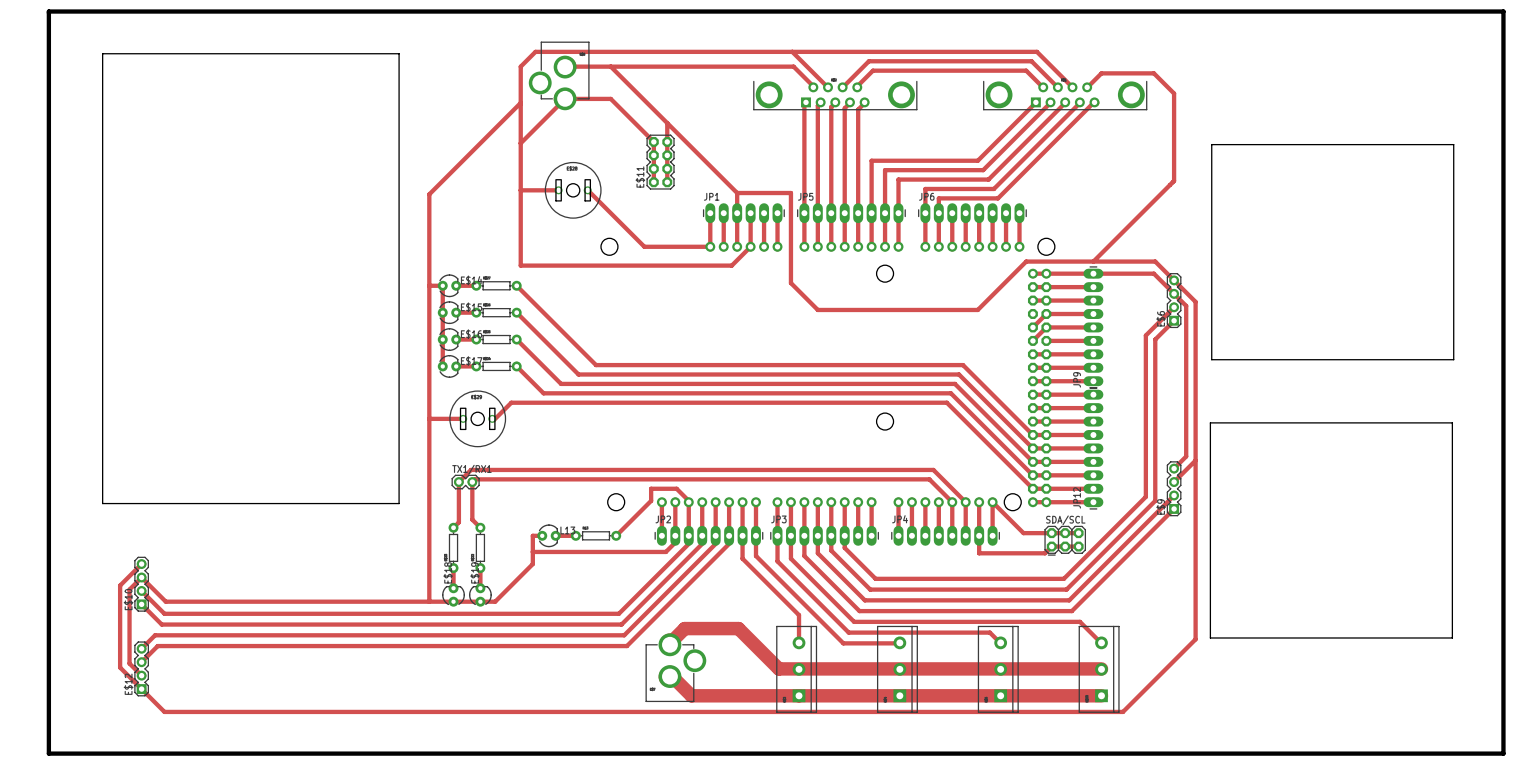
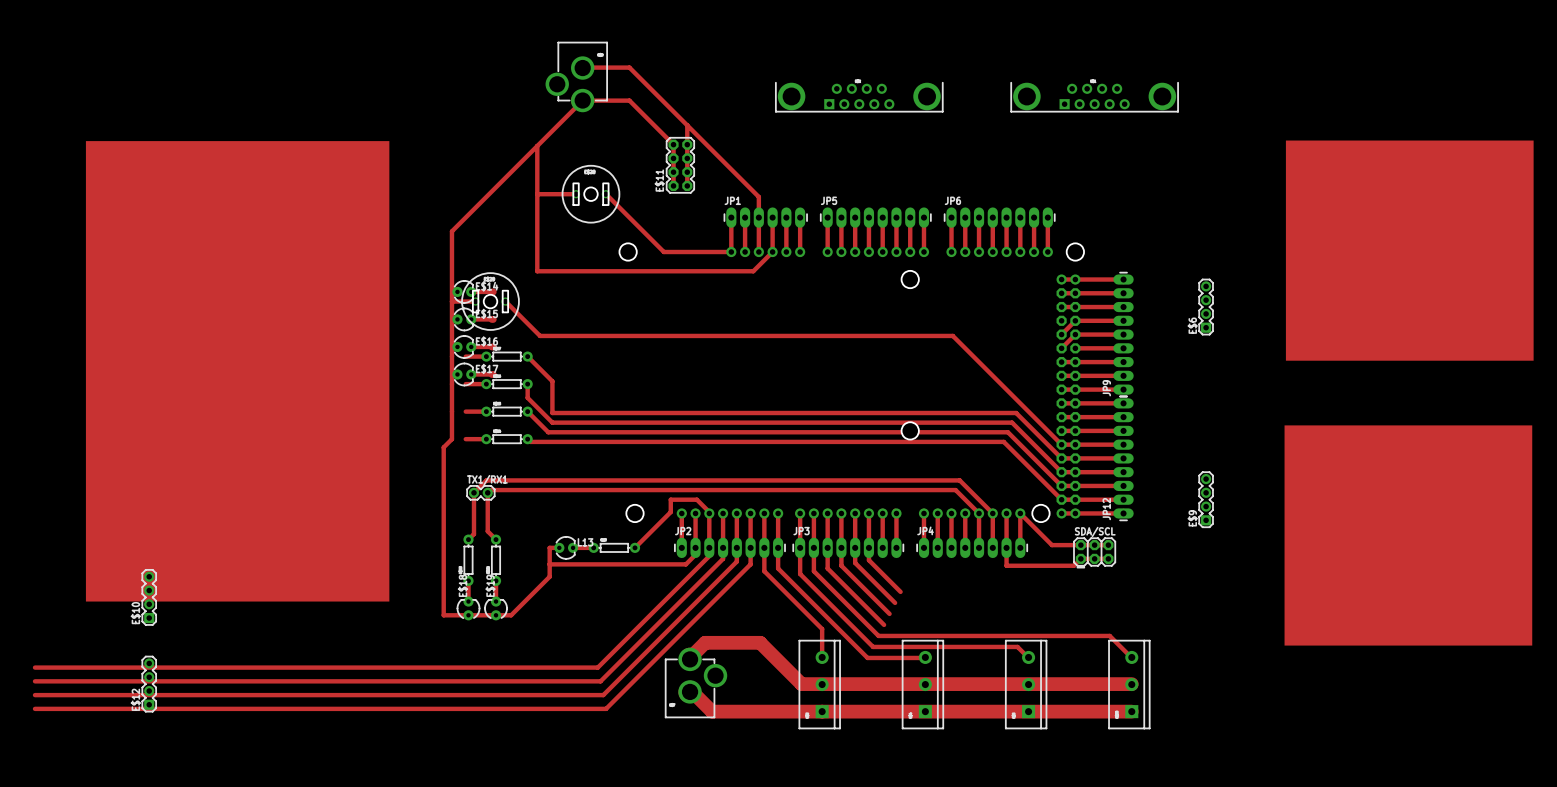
board edge: (48, 11) (1503, 11) (1503, 753) (48, 753) (48, 11) -> none
top track: (792, 51) (827, 86) -> none
board edge: (102, 53) (399, 53) (399, 503) (102, 503) (102, 53) -> none
top track: (610, 66) (793, 66) (813, 88) -> none
top track: (843, 86) (868, 61) (1031, 61) (1058, 86) -> none
top track: (1043, 86) (1026, 70) (872, 70) (856, 88) -> none
top track: (1086, 86) (1101, 73) (1153, 73) (1174, 93) (1174, 180) (1093, 261) -> none
top track: (1073, 88) (1036, 51) (535, 51) (520, 66) (520, 143) -> none
top track: (805, 101) (804, 213) -> none
top track: (820, 101) (817, 105) (817, 213) -> none
top track: (835, 101) (831, 106) (831, 213) -> none
top track: (850, 101) (844, 108) (844, 213) -> none
top track: (864, 101) (858, 109) (858, 213) -> none
top track: (1035, 101) (977, 160) (871, 160) (871, 213) -> none
top track: (1050, 101) (983, 170) (885, 170) (885, 206) -> none
top track: (1065, 101) (988, 179) (898, 179) (898, 213) -> none
top track: (1079, 101) (993, 188) (925, 188) (925, 206) -> none
top track: (520, 102) (429, 194) (429, 437) -> (537, 146) (451, 231) (451, 439) (443, 447)
top track: (1096, 102) (1094, 101) (997, 198) (938, 198) (938, 213) -> none
drawing: none -> [1285, 140, 1534, 361]
drawing: none -> [85, 141, 390, 602]
board edge: (1211, 144) (1453, 144) (1453, 359) (1211, 359) (1211, 144) -> none
top track: (737, 193) (790, 193) (790, 283) (817, 309) (977, 309) (1026, 261) (1155, 261) (1195, 301) (1195, 639) (1123, 711) (164, 711) (120, 667) (120, 585) (142, 564) -> none
top track: (1094, 273) (1153, 273) (1186, 305) (1186, 456) (1174, 469) -> none
top track: (429, 285) (442, 285) (442, 366) -> none
part position: (496, 285) -> (507, 356)
top track: (515, 285) (596, 365) (963, 365) -> (505, 301) (540, 335) (952, 335) (990, 373)
top track: none -> (451, 301) (476, 301)
top track: (1174, 305) (1145, 335) (1145, 496) (1063, 578) (875, 578) -> none
part position: (496, 312) -> (507, 384)
top track: (515, 312) (578, 374) (958, 374) (988, 404) -> (527, 356) (552, 381) (552, 413) (1016, 413)
top track: (1174, 319) (1155, 339) (1155, 500) (1066, 589) (870, 589) -> none
part position: (496, 339) -> (507, 411)
top track: (516, 339) (561, 383) (954, 383) (984, 413) -> (527, 384) (527, 397) (552, 422) (1012, 422)
top track: none -> (465, 356) (486, 356)
top track: (516, 365) (543, 393) (950, 393) (980, 422) -> (527, 411) (548, 432) (1007, 432)
part position: (496, 366) -> (507, 439)
top track: none -> (465, 384) (486, 384)
top track: none -> (465, 411) (486, 411)
drawing: none -> [1284, 425, 1533, 646]
top track: (429, 418) (462, 418) -> none
part position: (477, 418) -> (490, 301)
top track: (493, 420) (511, 402) (946, 402) (976, 432) -> (527, 439) (530, 441) (1003, 441)
board edge: (1210, 422) (1452, 422) (1452, 637) (1210, 637) (1210, 422) -> none
top track: none -> (465, 439) (486, 439)
top track: (1195, 460) (1174, 483) -> none
top track: (1174, 494) (1069, 600) (864, 600) -> none
top track: (1174, 507) (1071, 611) (859, 611) -> none
top track: none -> (723, 547) (723, 558) (600, 681) (35, 681)
top track: none -> (736, 547) (736, 561) (603, 695) (35, 695)
top track: none -> (750, 547) (750, 564) (606, 708) (35, 708)
top track: (702, 543) (621, 624) (161, 624) (142, 604) -> none
top track: (715, 543) (624, 635) (155, 635) (142, 648) -> none
top track: (729, 543) (626, 646) (157, 646) (142, 662) -> none
top track: (141, 577) (129, 589) (129, 663) (142, 675) -> none
top track: (141, 577) (165, 601) (429, 601) -> none
top track: (142, 590) (164, 613) (618, 613) -> (35, 667) (597, 667) (637, 627)

